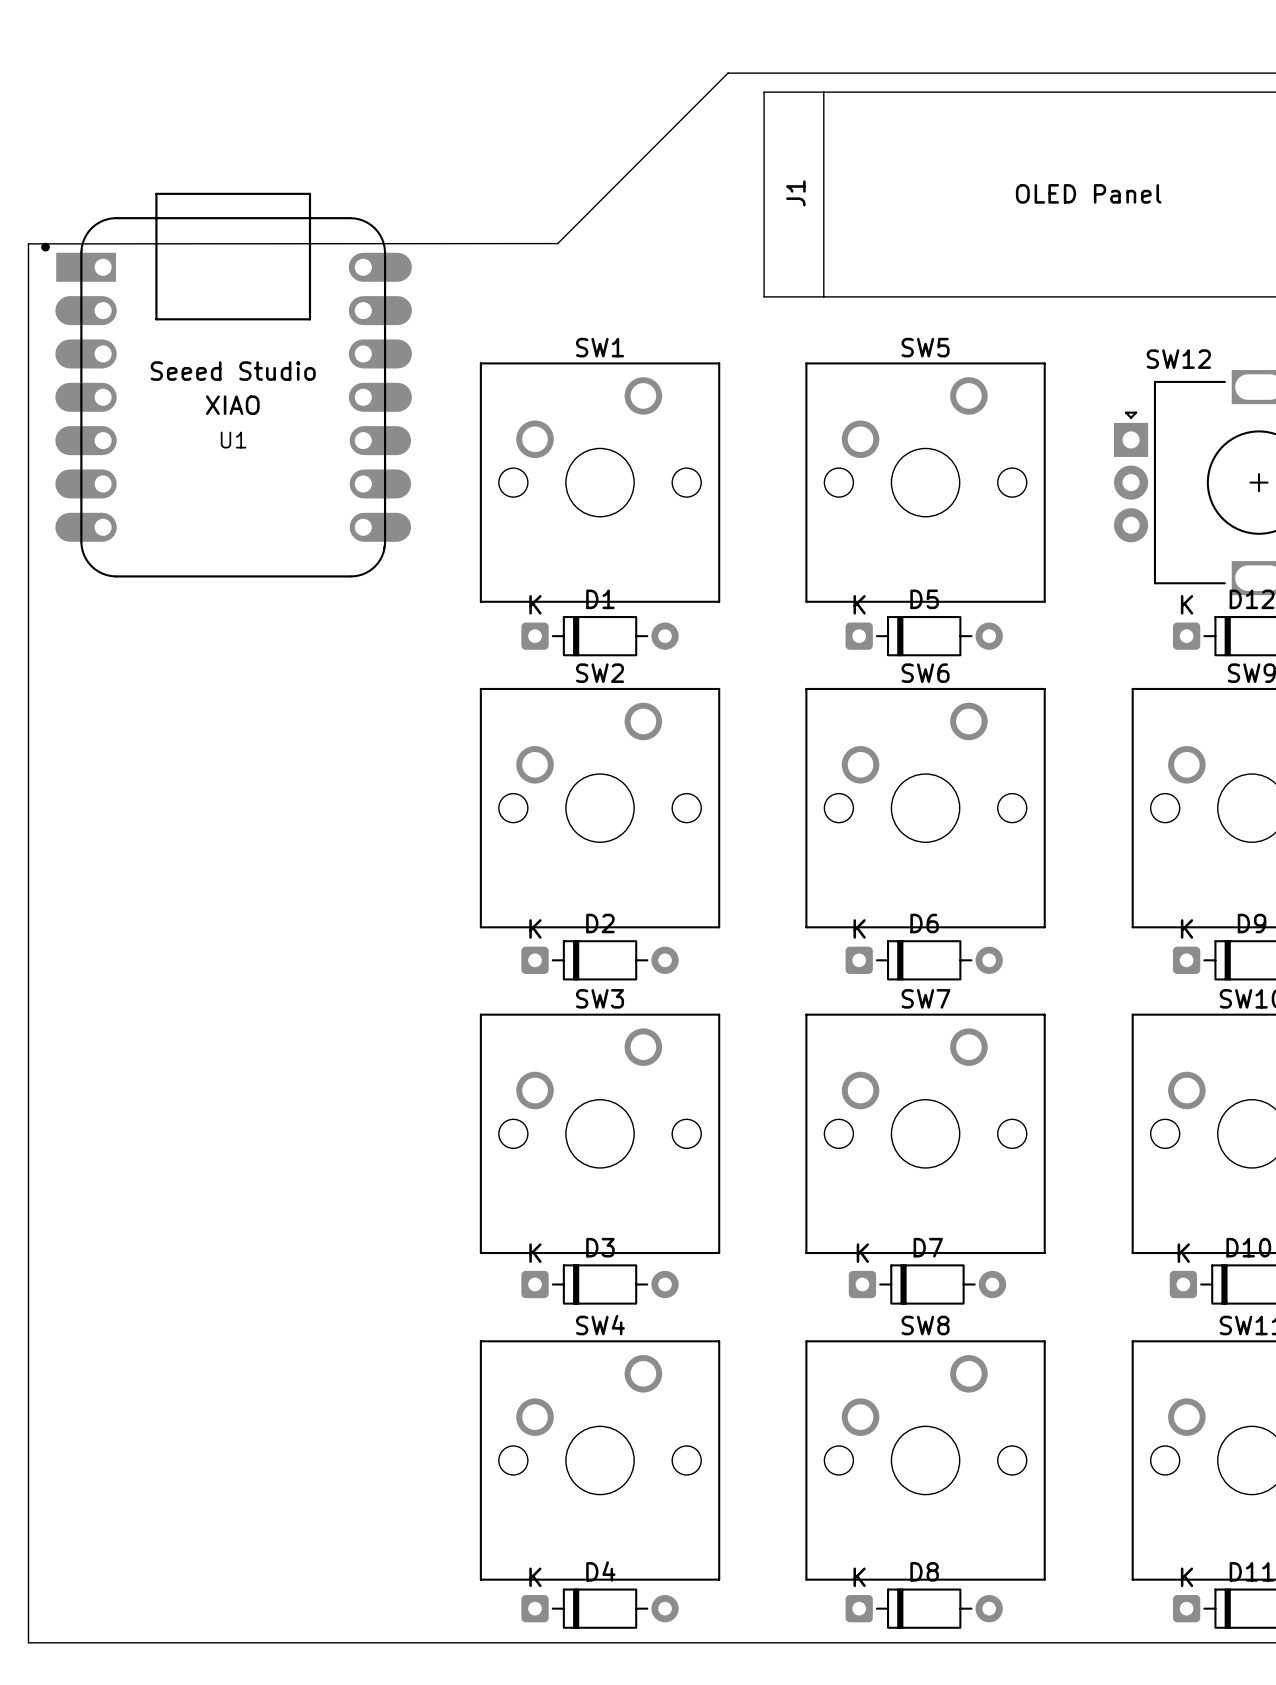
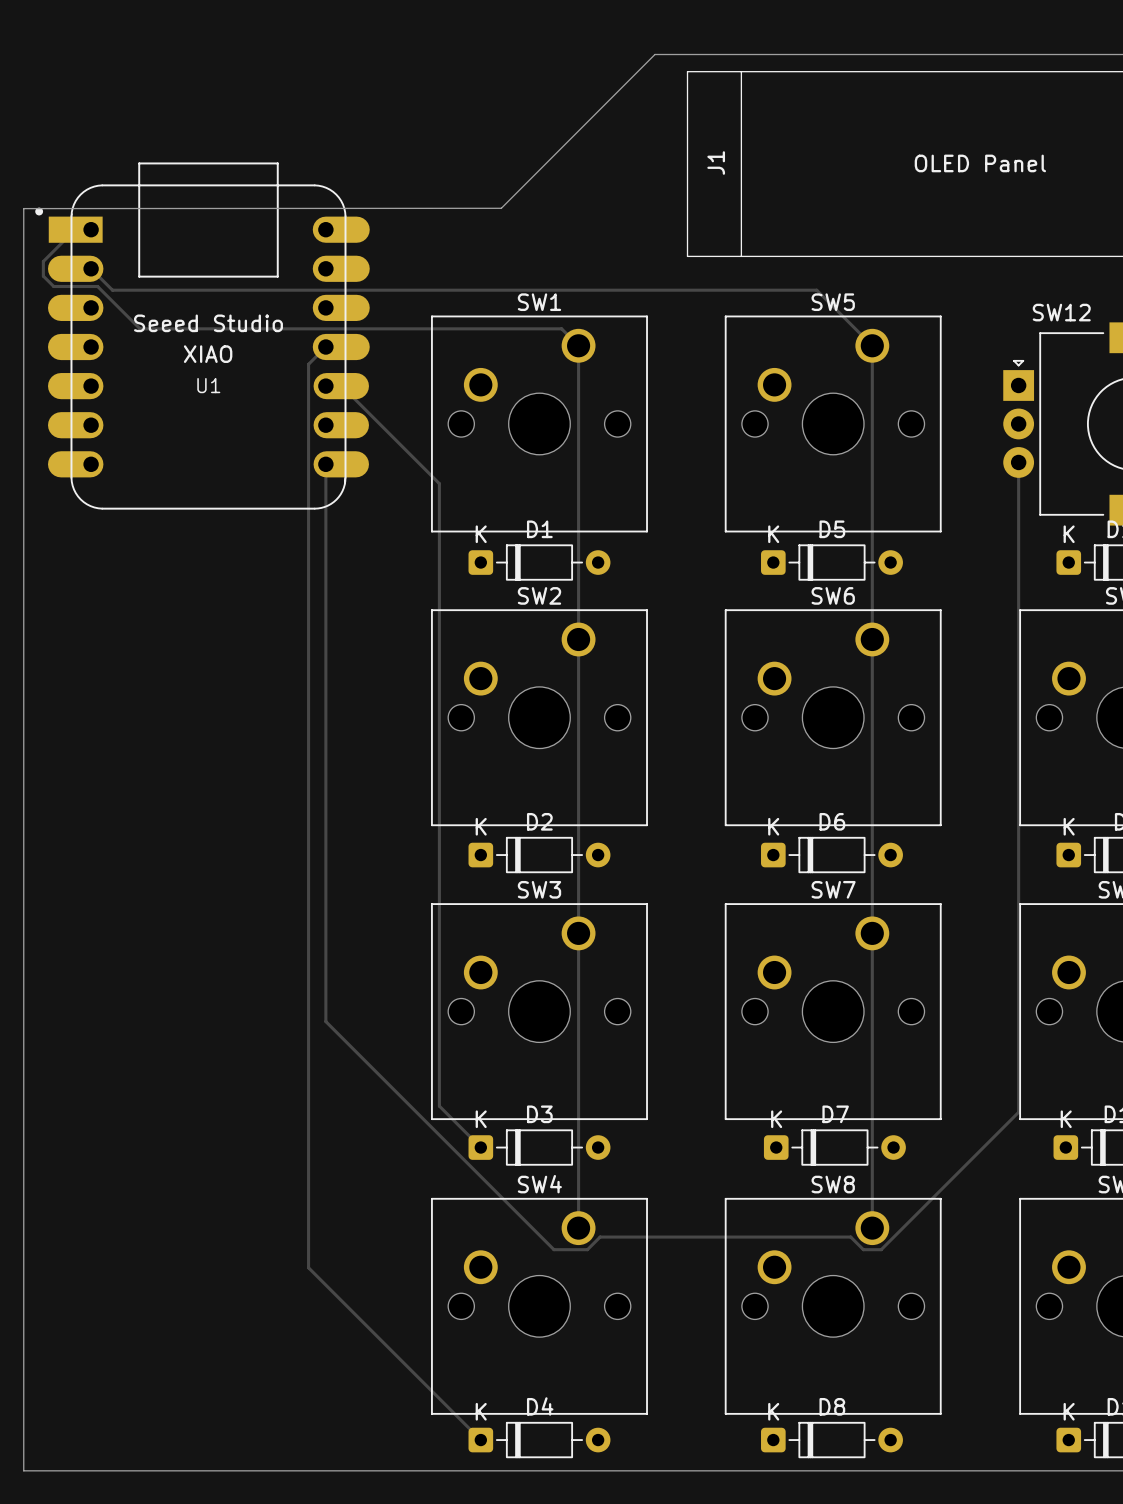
track: none -> (91, 229) (75, 229) (43, 261) (43, 276) (53, 286) (97, 286) (140, 328) (561, 328) (578, 345) (578, 1228)
track: none -> (91, 268) (112, 290) (816, 290) (872, 345) (872, 1228)
track: none -> (325, 347) (308, 364) (308, 1267) (480, 1440)
track: none -> (325, 386) (341, 386) (439, 483) (439, 1106) (480, 1147)
track: none -> (1018, 462) (1018, 1112) (881, 1249) (863, 1249) (850, 1237) (600, 1237) (587, 1249) (553, 1249) (325, 1021) (325, 464)

